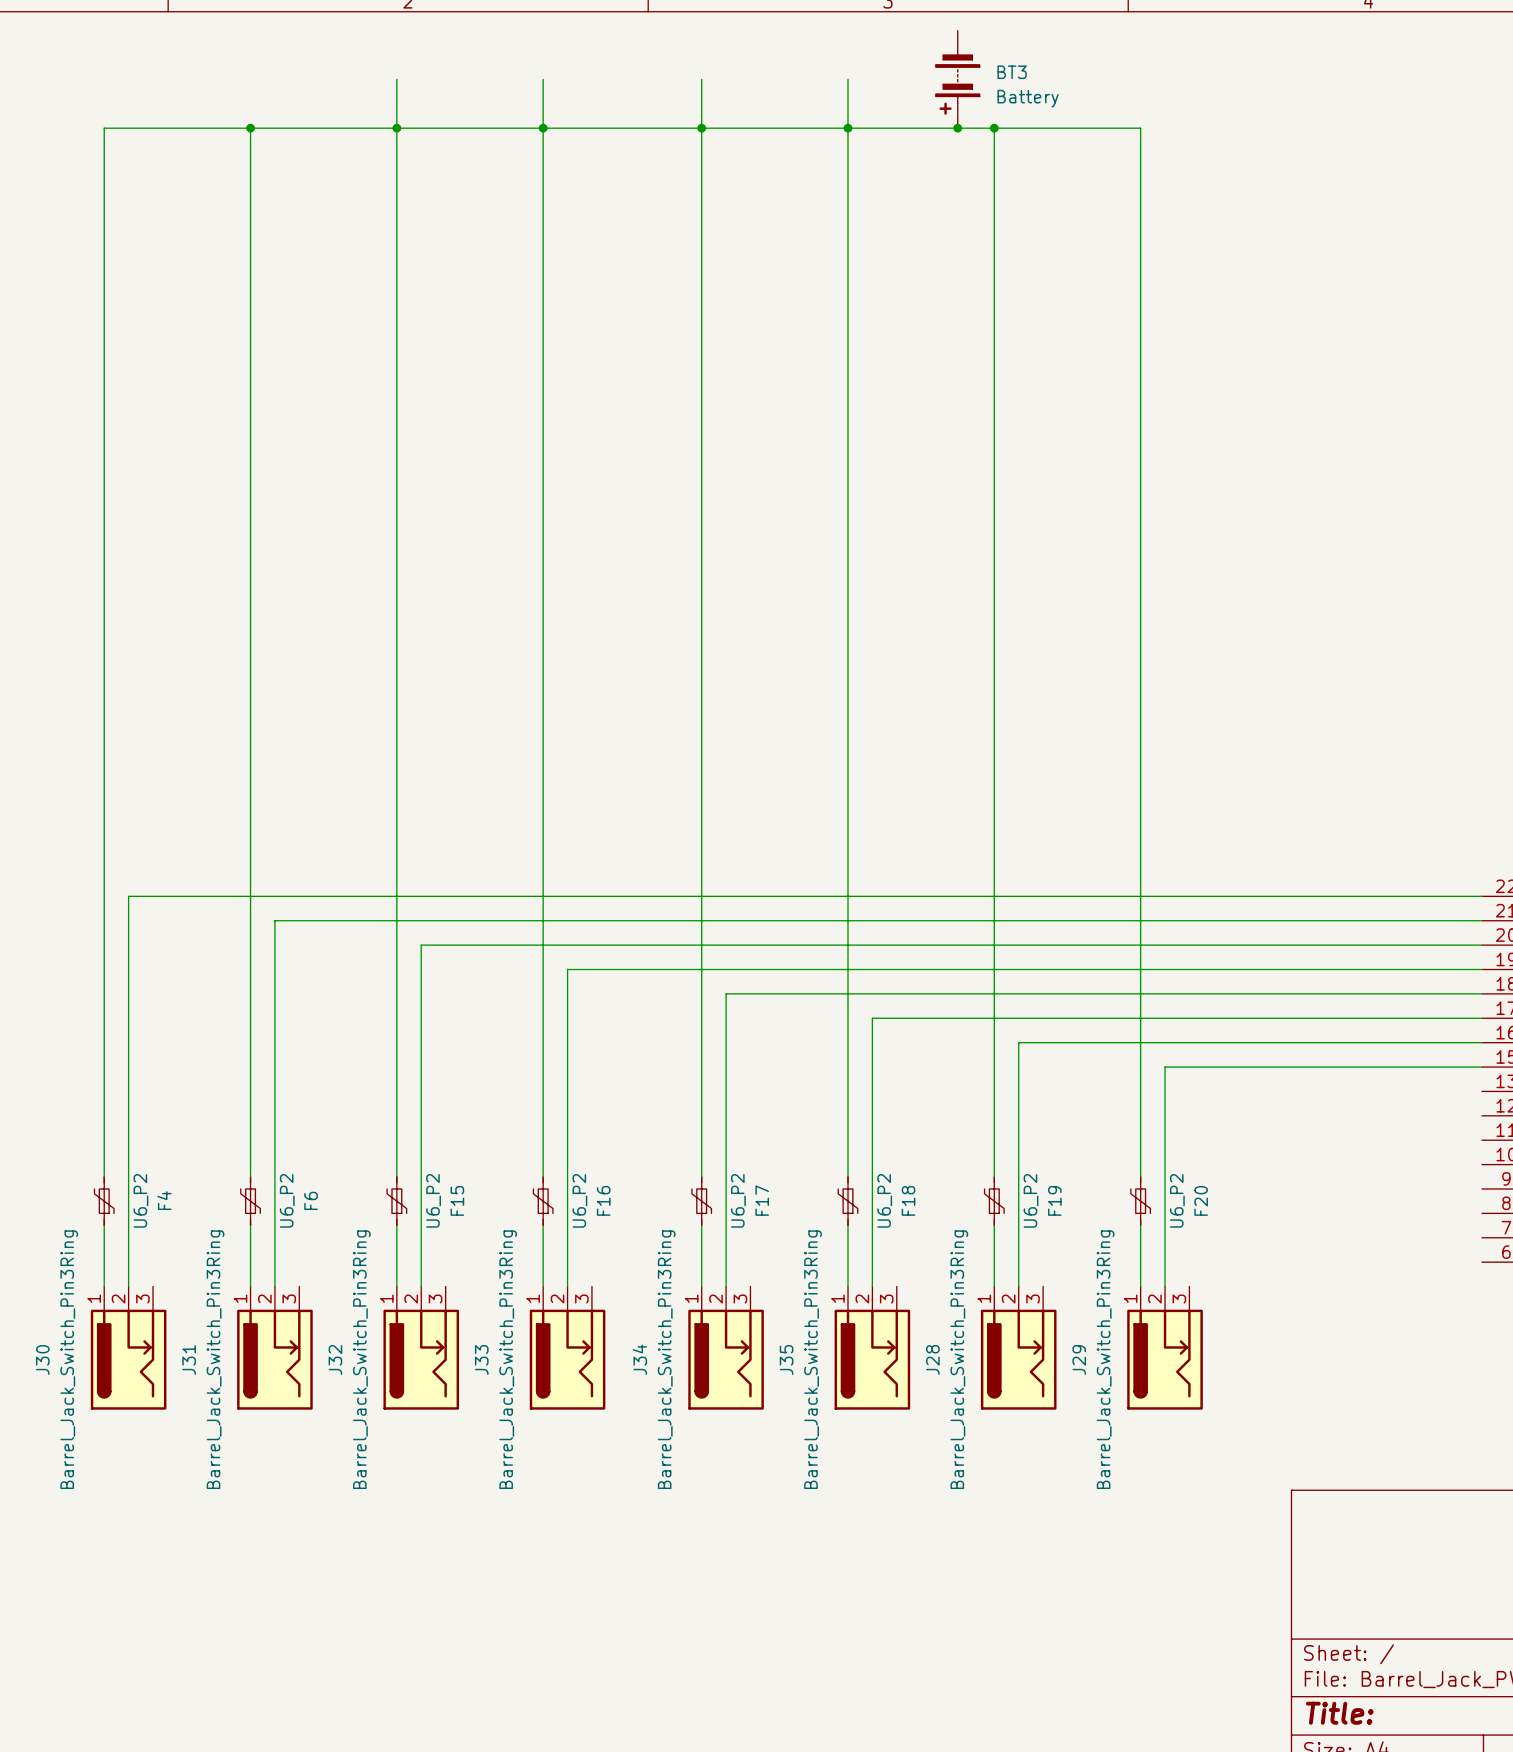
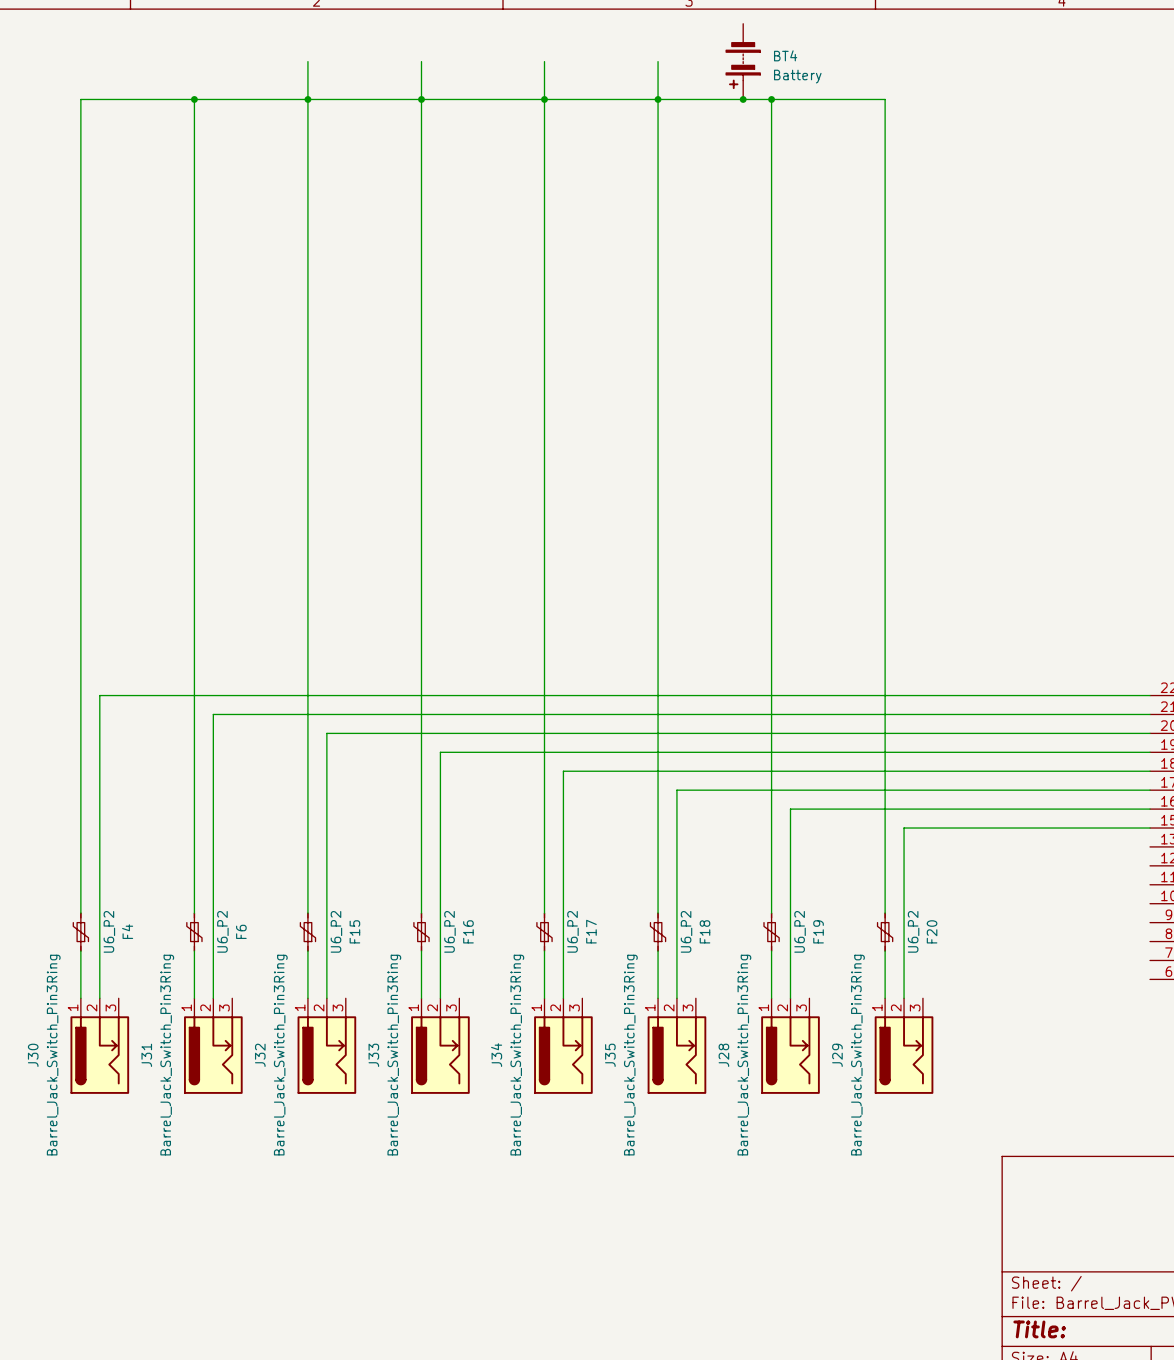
BT3 name: BT3 (1012, 72) -> BT4 (785, 55)

